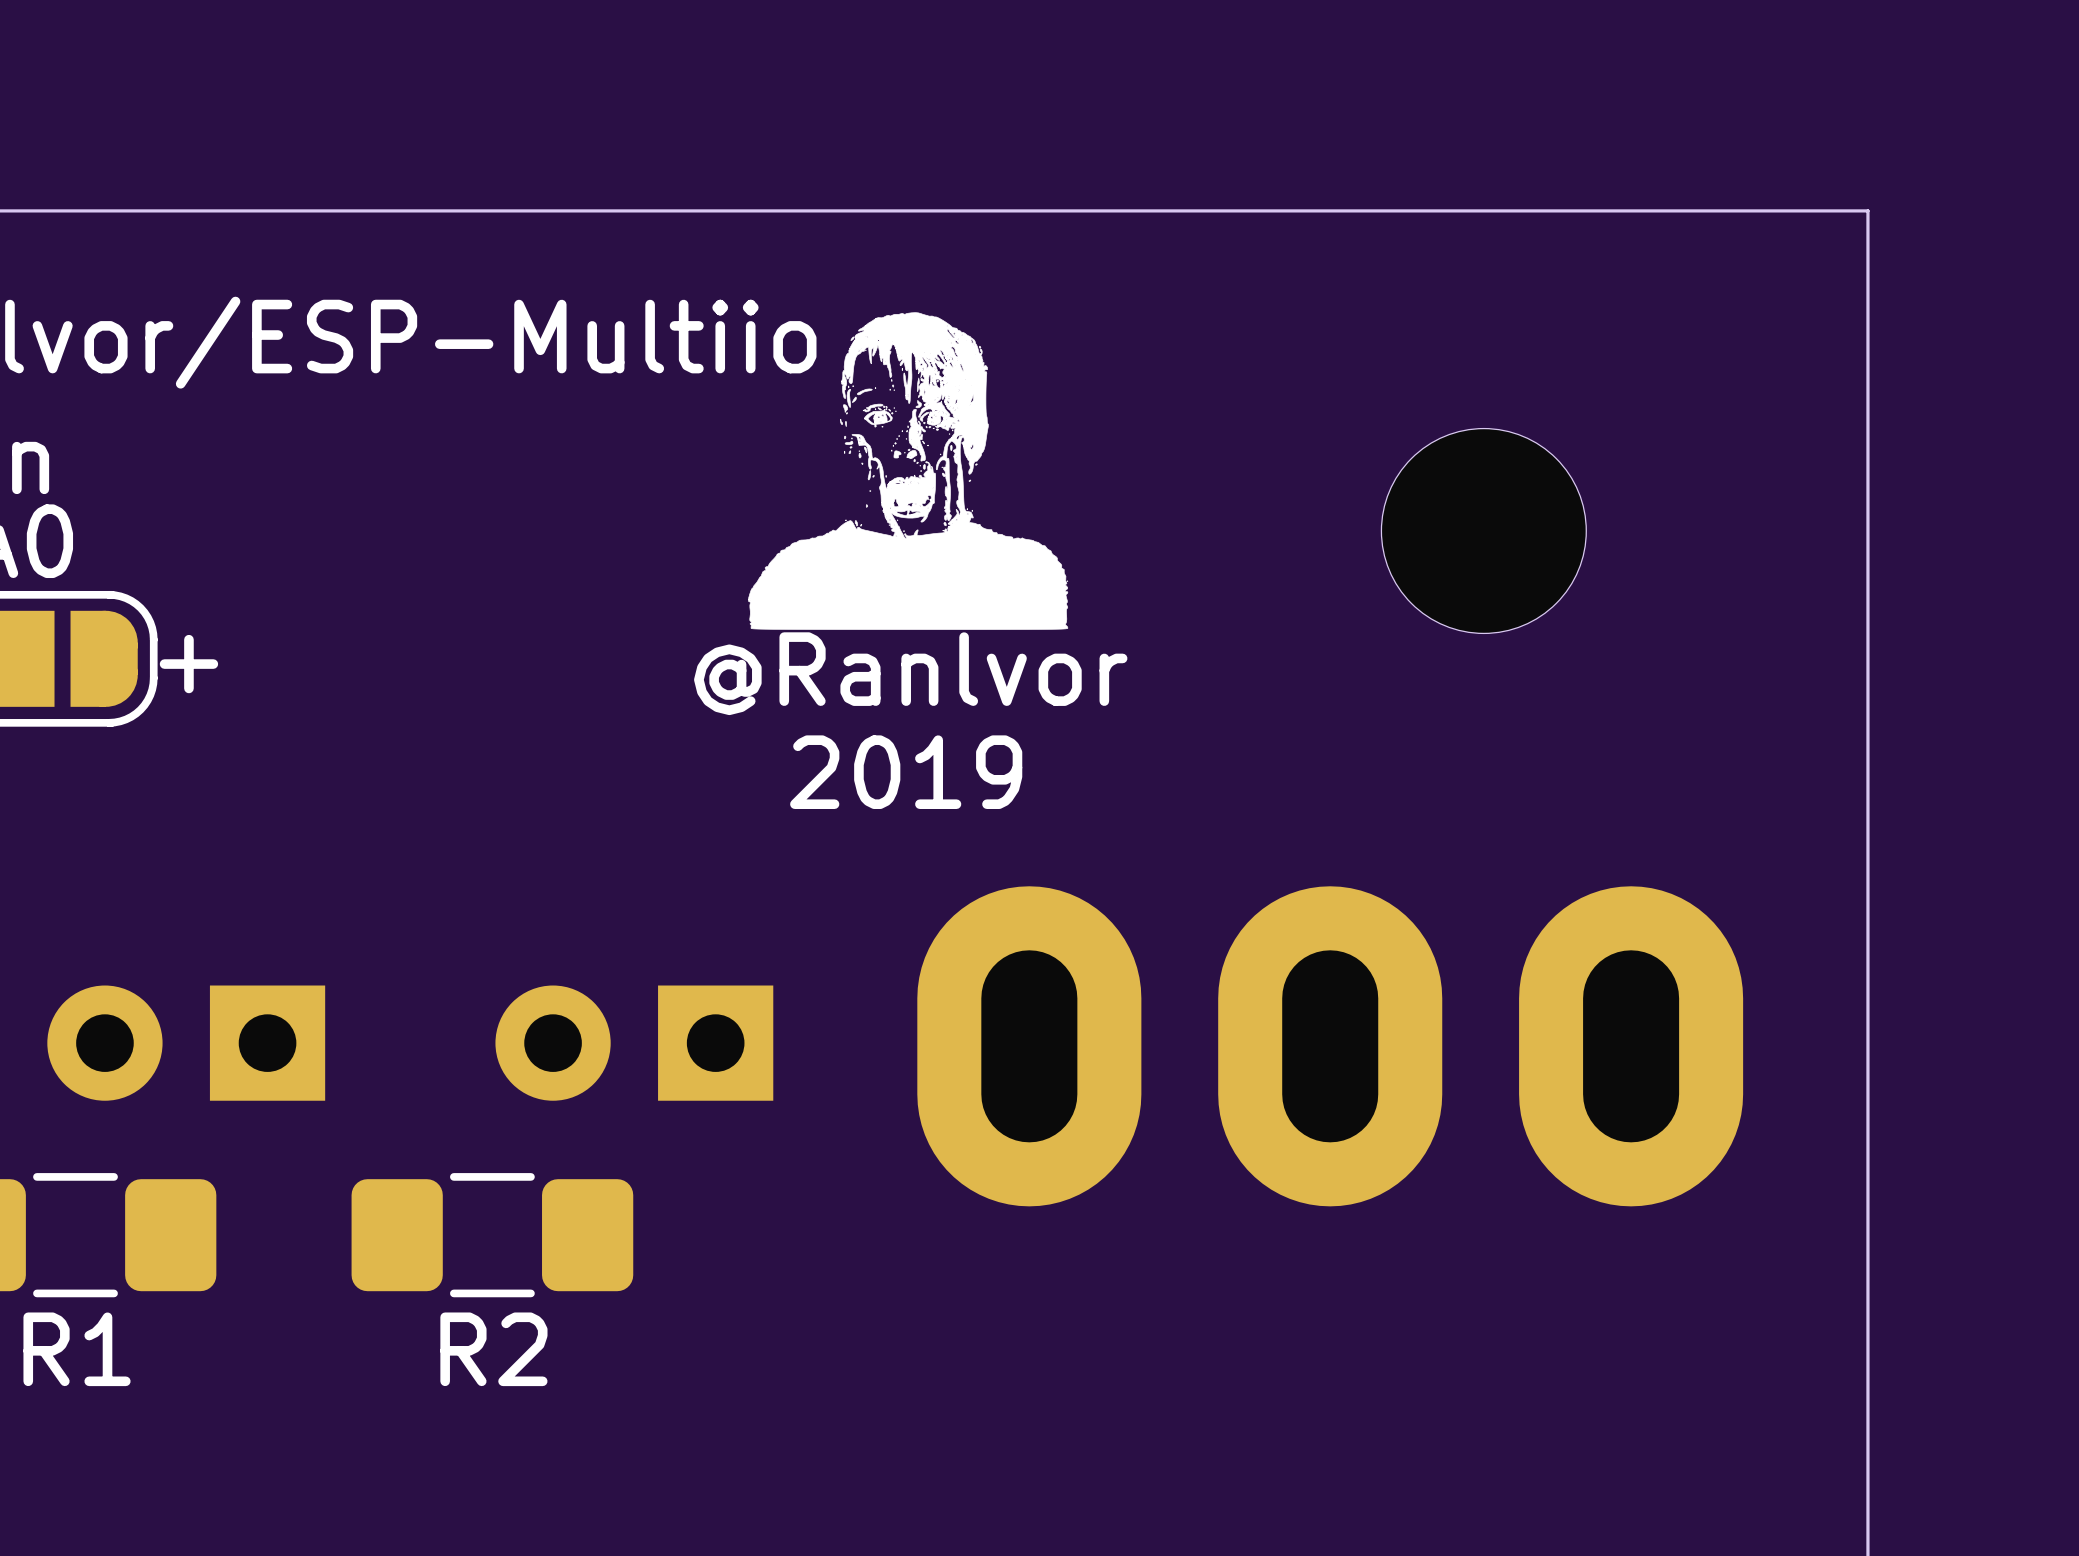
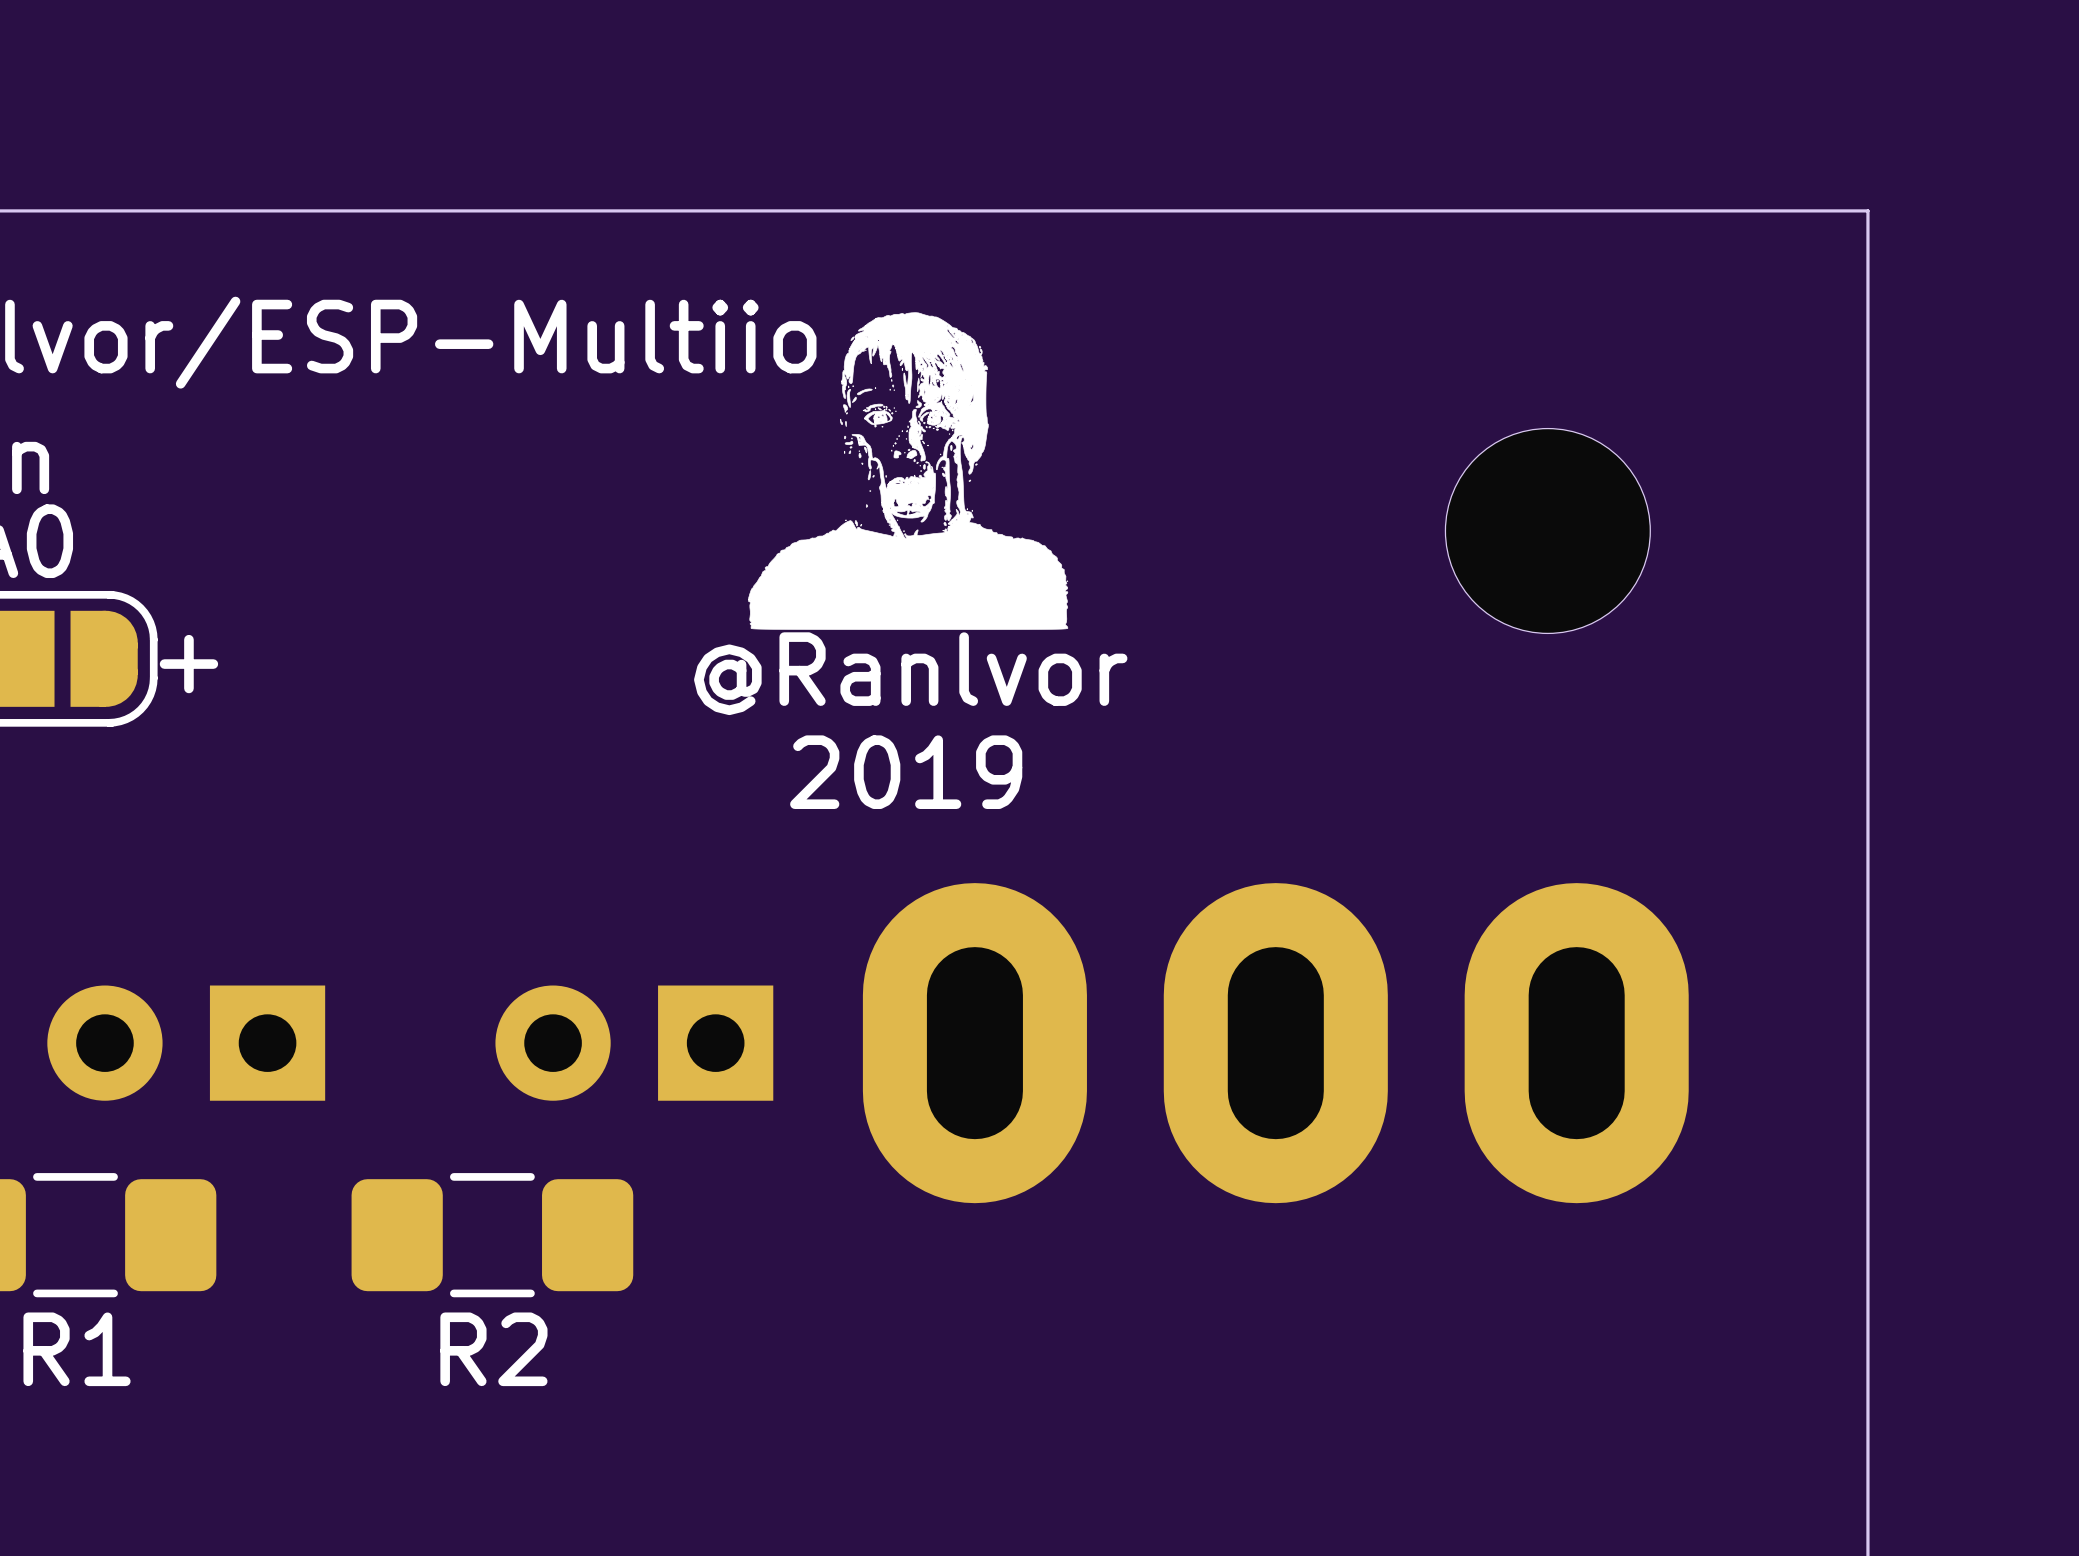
part position: (1483, 530) -> (1547, 530)
part position: (1330, 1046) -> (1275, 1043)

